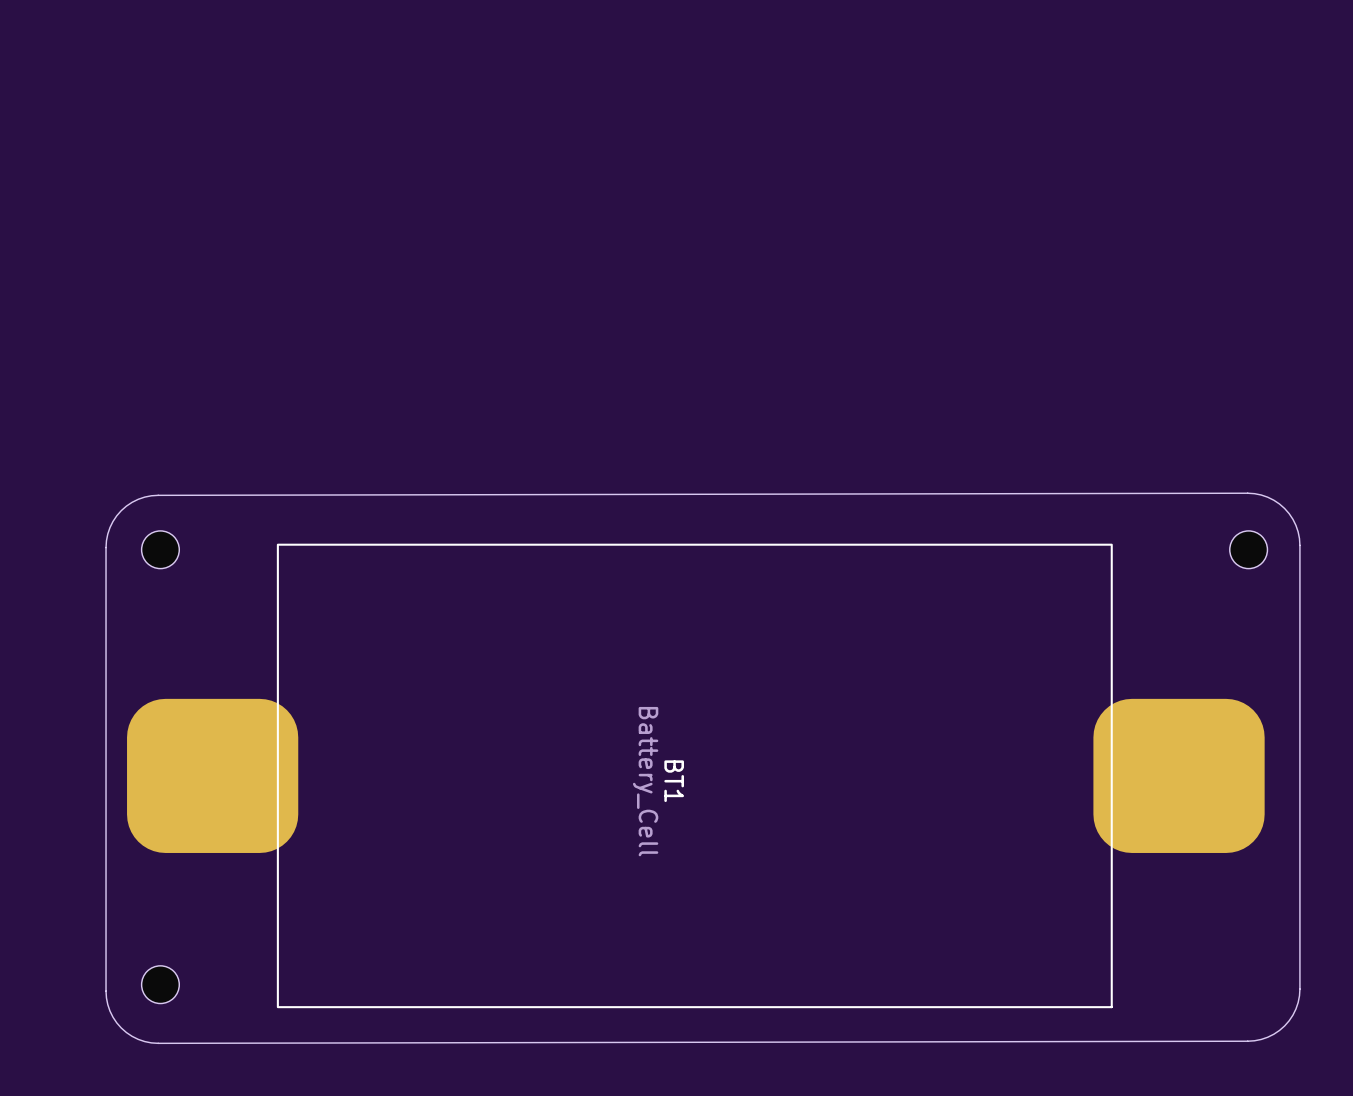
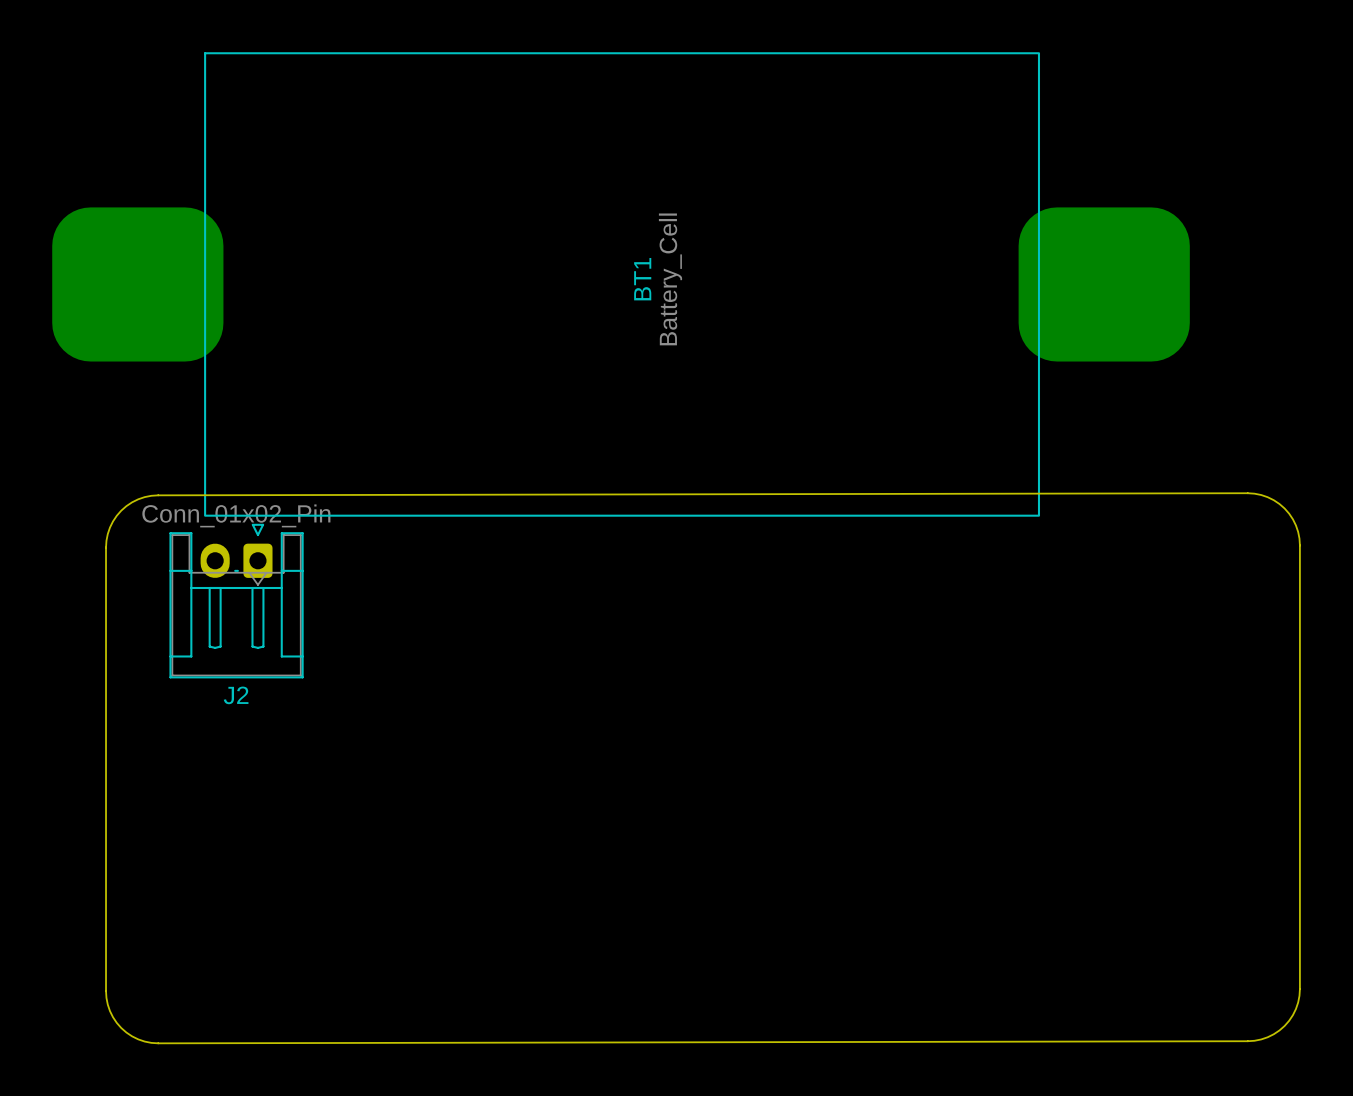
part: (160, 549) -> none
part: (1248, 549) -> none
J2: none -> Conn_01x02_Pin (236, 601)
BT1 rotation: 0° (695, 775) -> 180° (621, 284)
part: (160, 984) -> none

